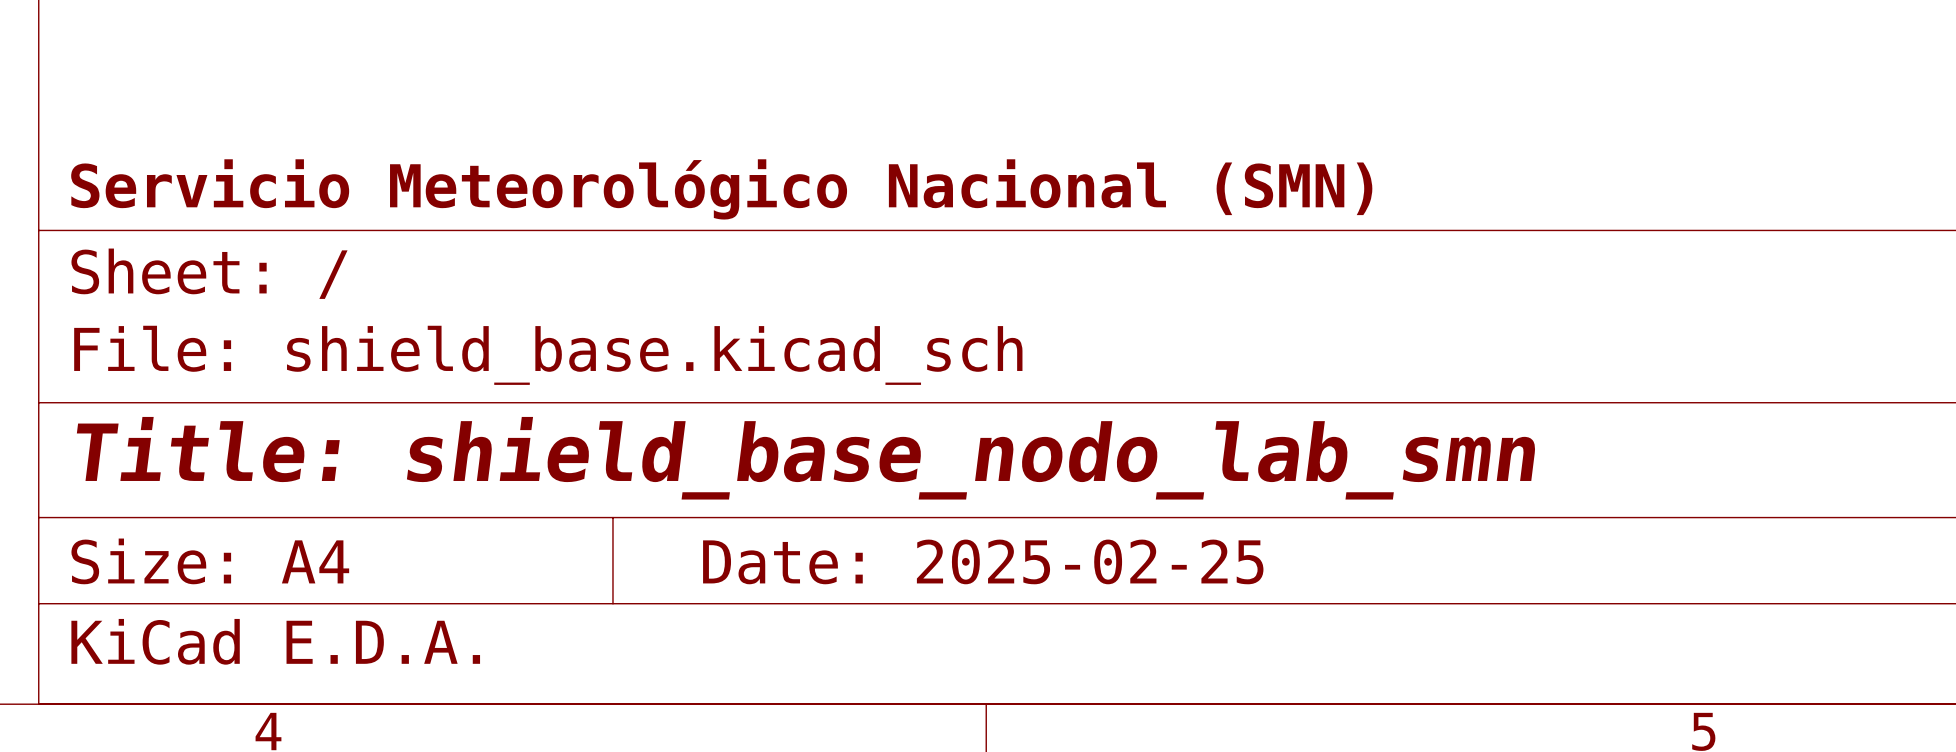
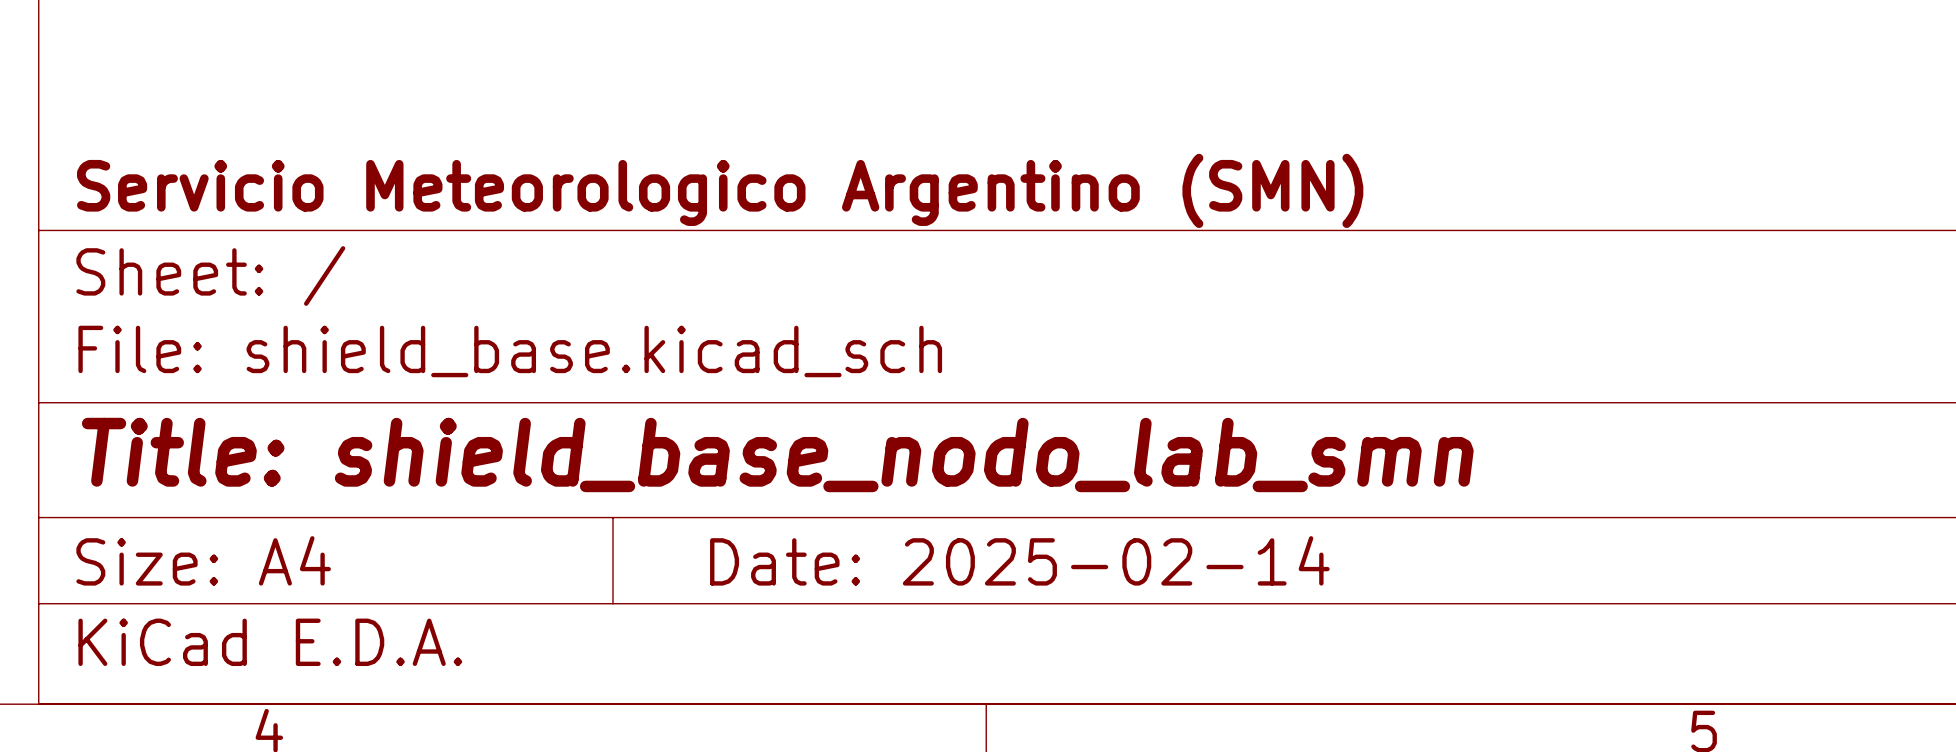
title block: Servicio Meteorológico Nacional (SMN) (721, 189) -> Servicio Meteorologico Argentino (SMN) (720, 190)
title block: Date: 2025-02-25 (983, 561) -> Date: 2025-02-14 (1019, 560)

